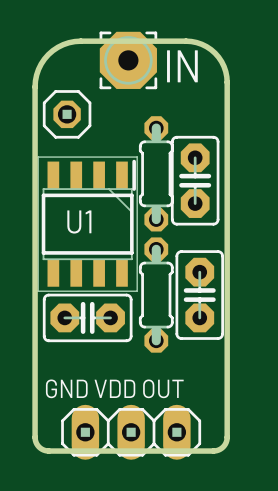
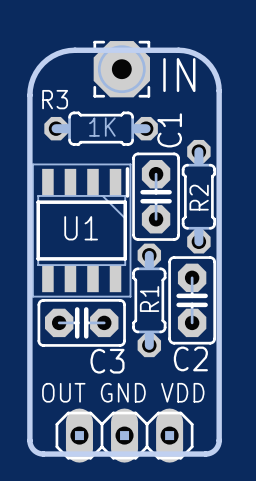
part: (67, 114) -> none
R3: none -> 1K (101, 128)
part: (156, 173) -> none
part: (195, 180) -> none
C1: none -> (156, 196)
R2: none -> (198, 196)
R1 name: none -> R1 (149, 299)
C2 name: none -> C2 (190, 358)
C3 name: none -> C3 (107, 361)
text: GND VDD OUT (114, 388) -> OUT GND VDD (123, 392)

